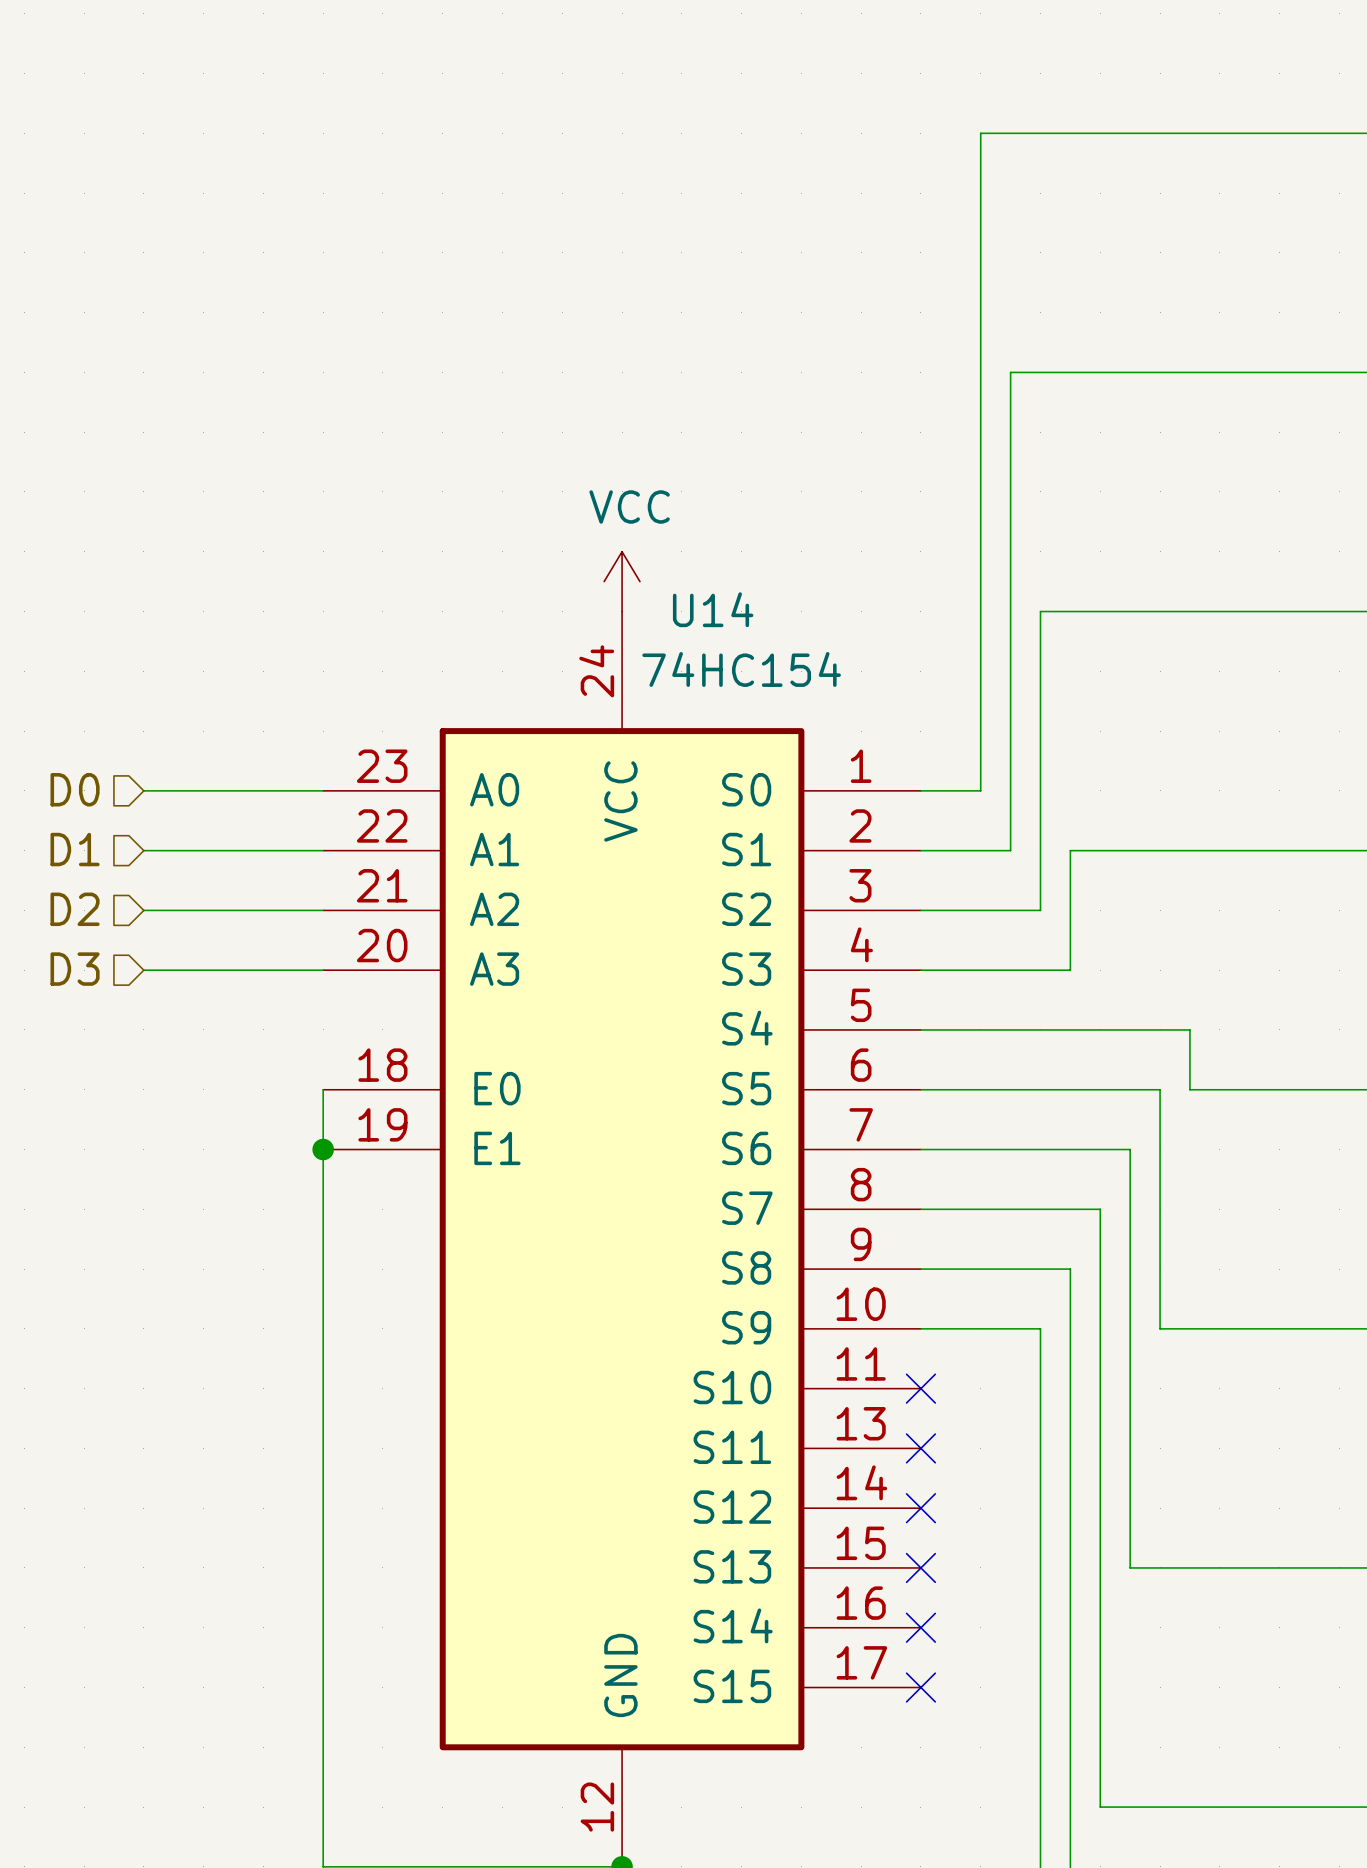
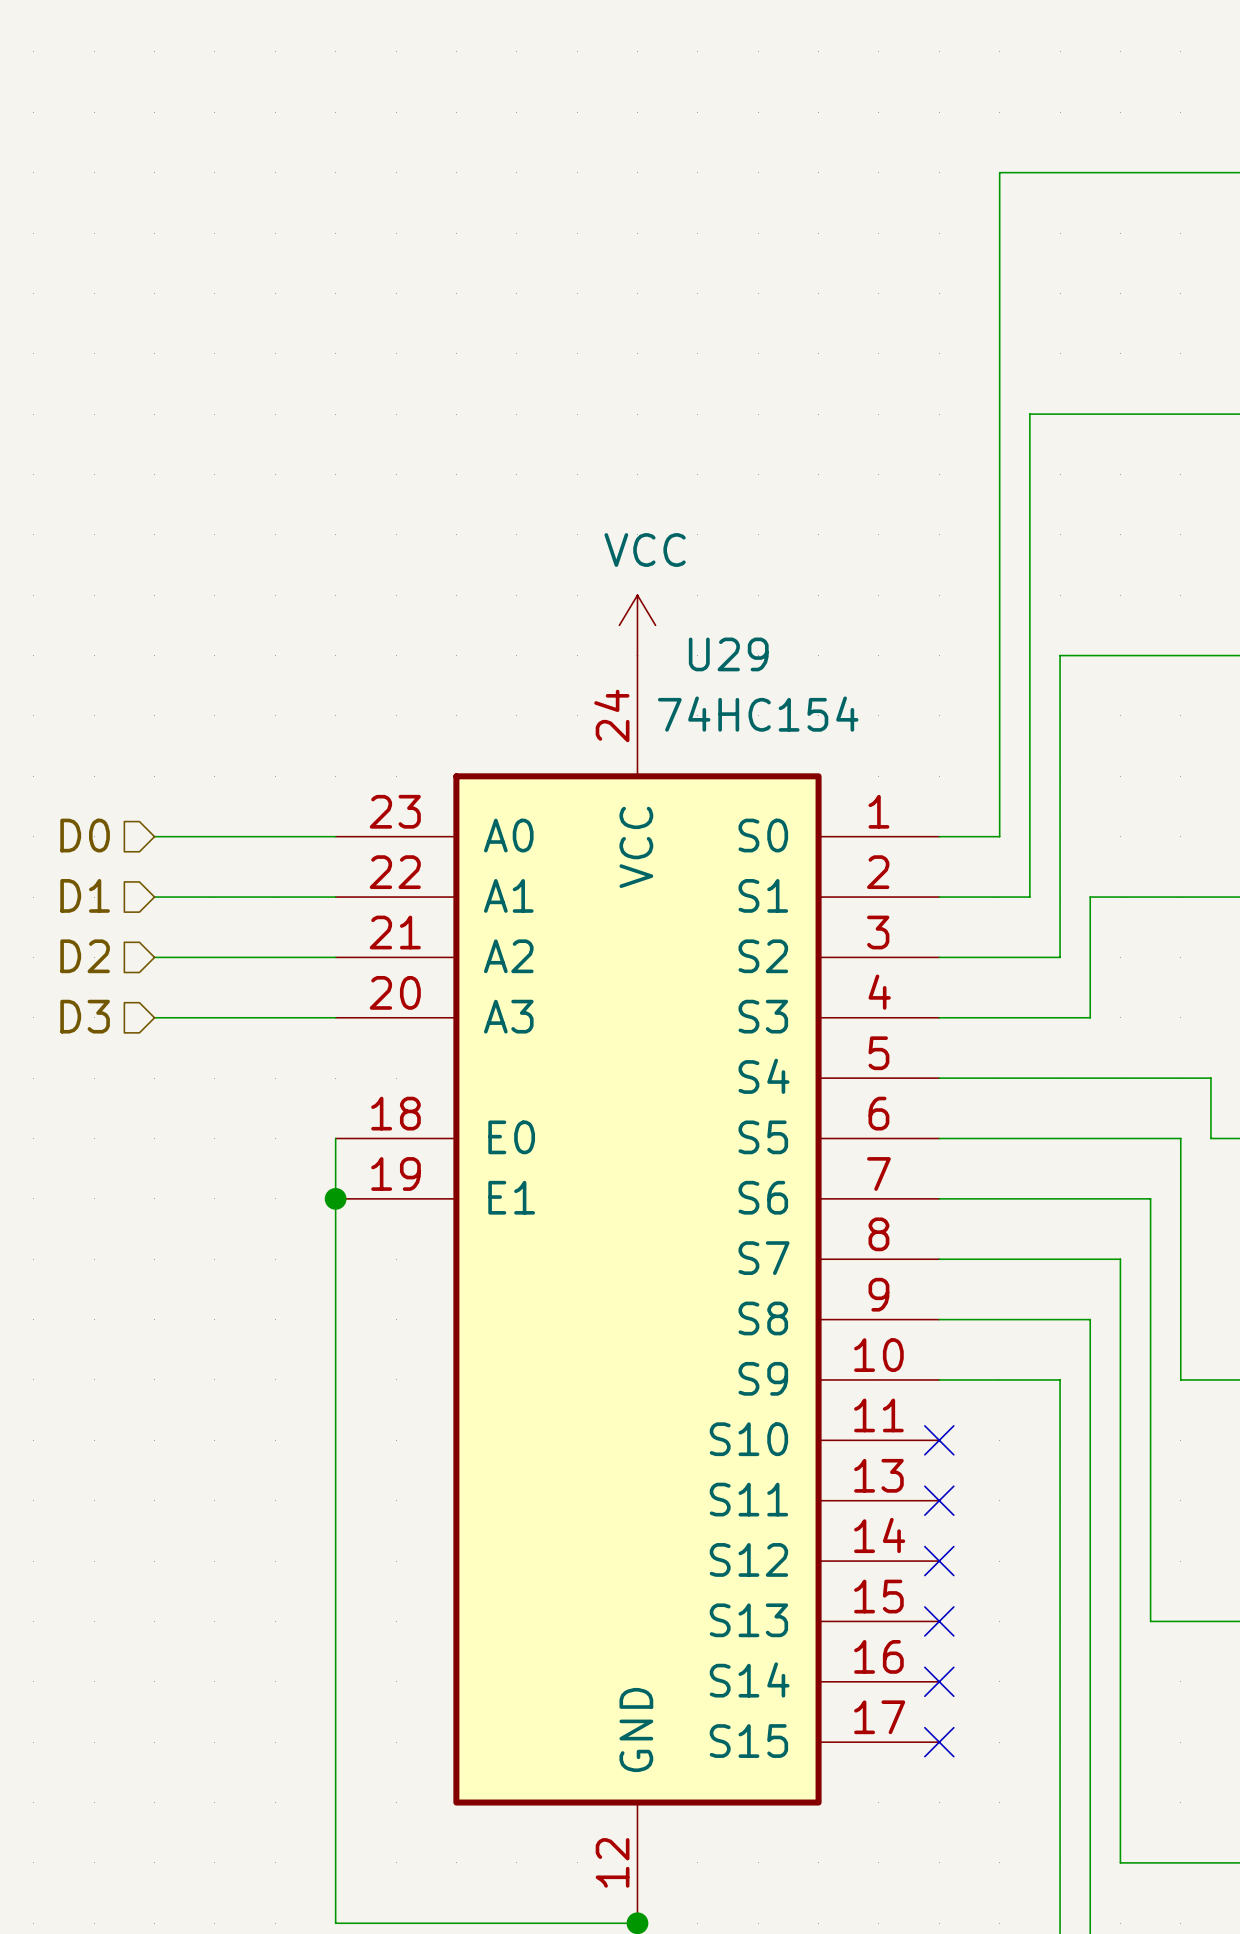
U14 name: U14 (713, 609) -> U29 (728, 654)

